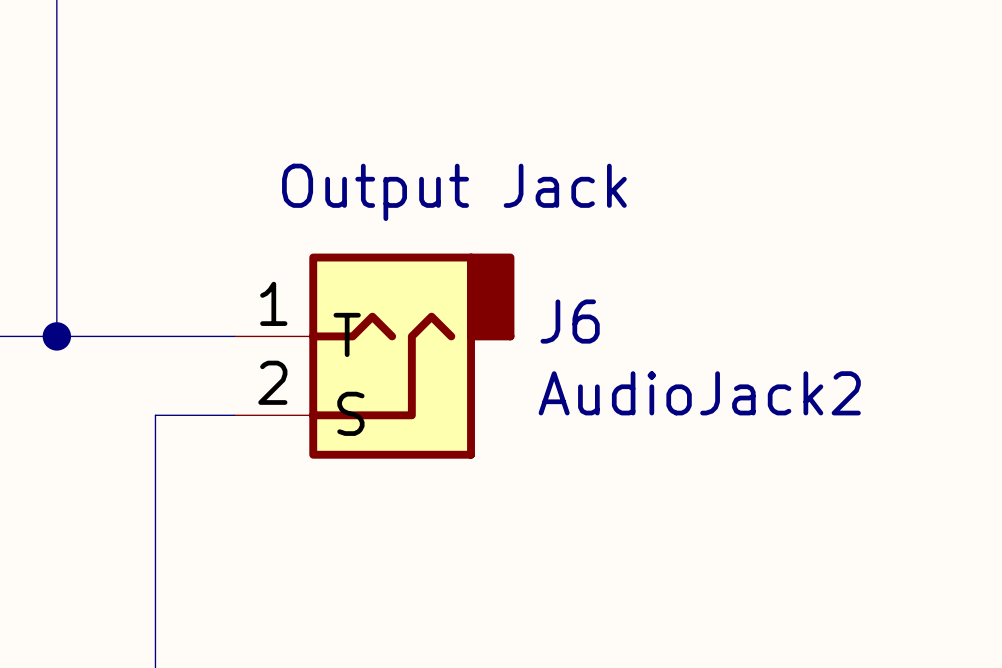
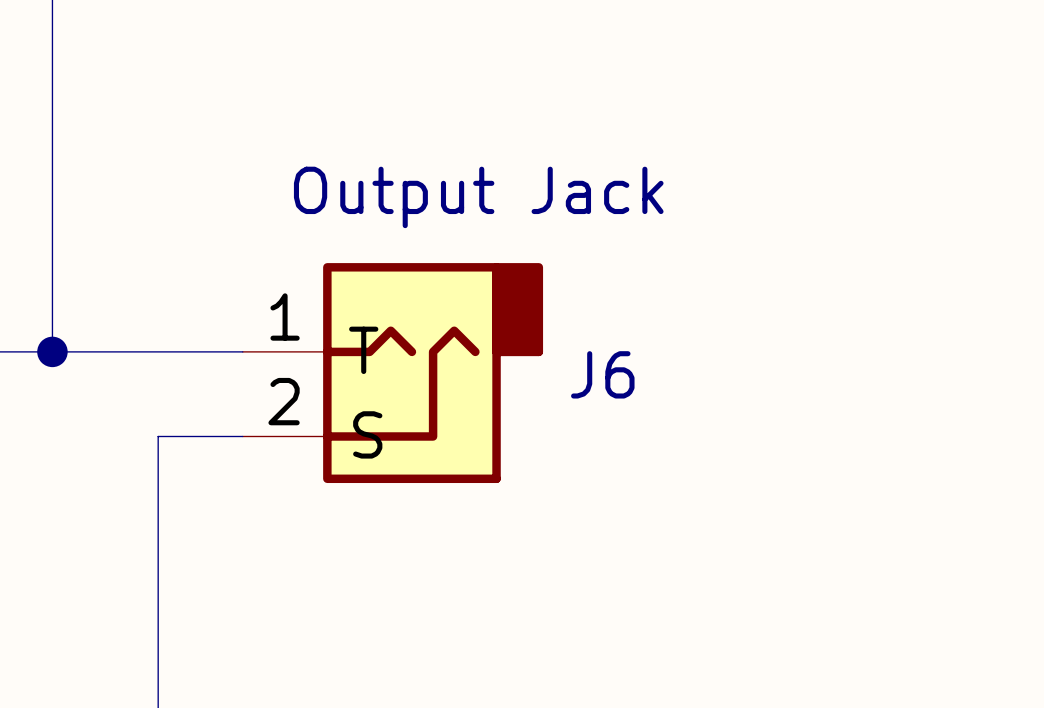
J6 name position: J6 (570, 321) -> J6 (602, 374)
J6 value: AudioJack2 (699, 393) -> none

